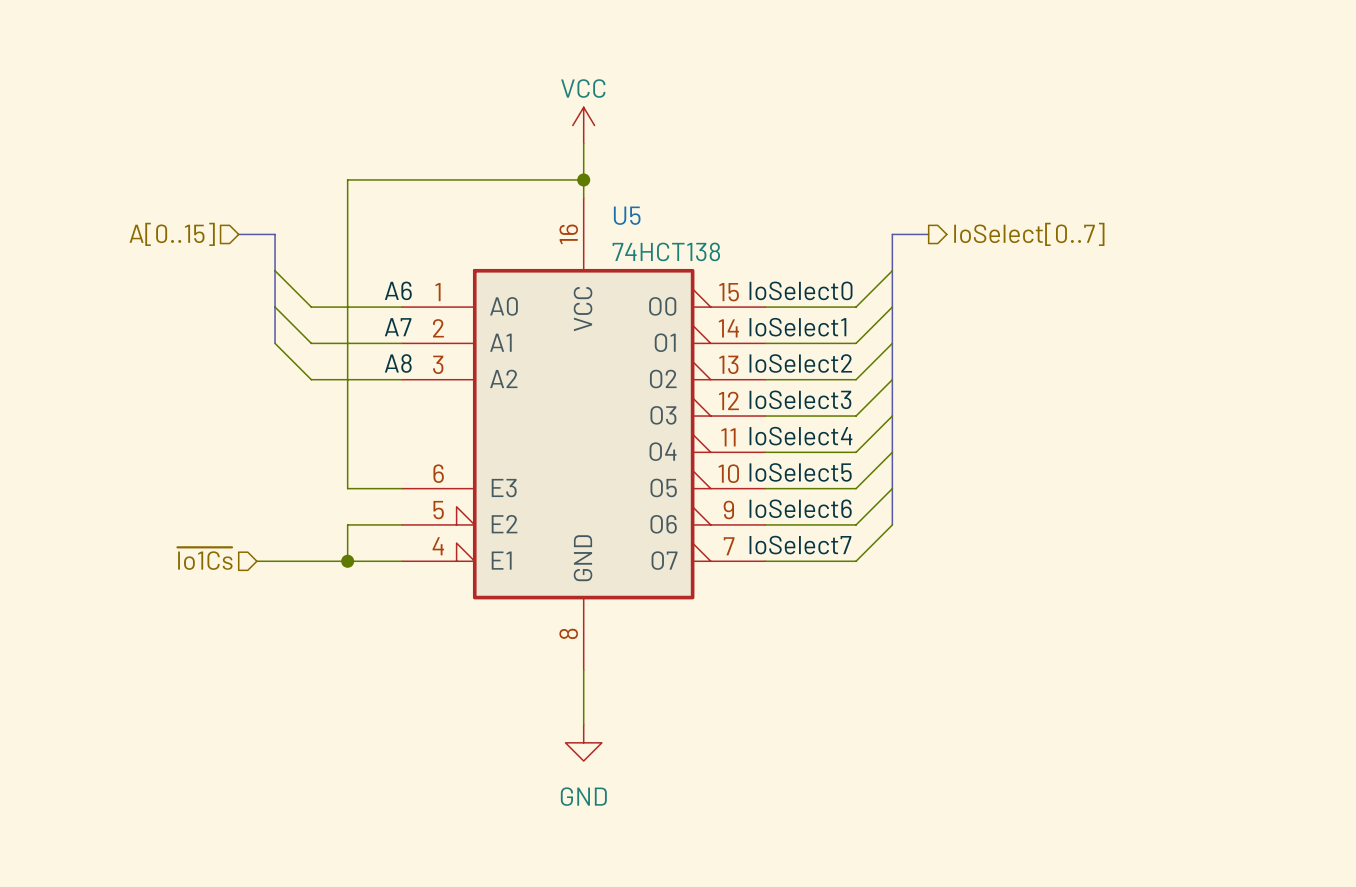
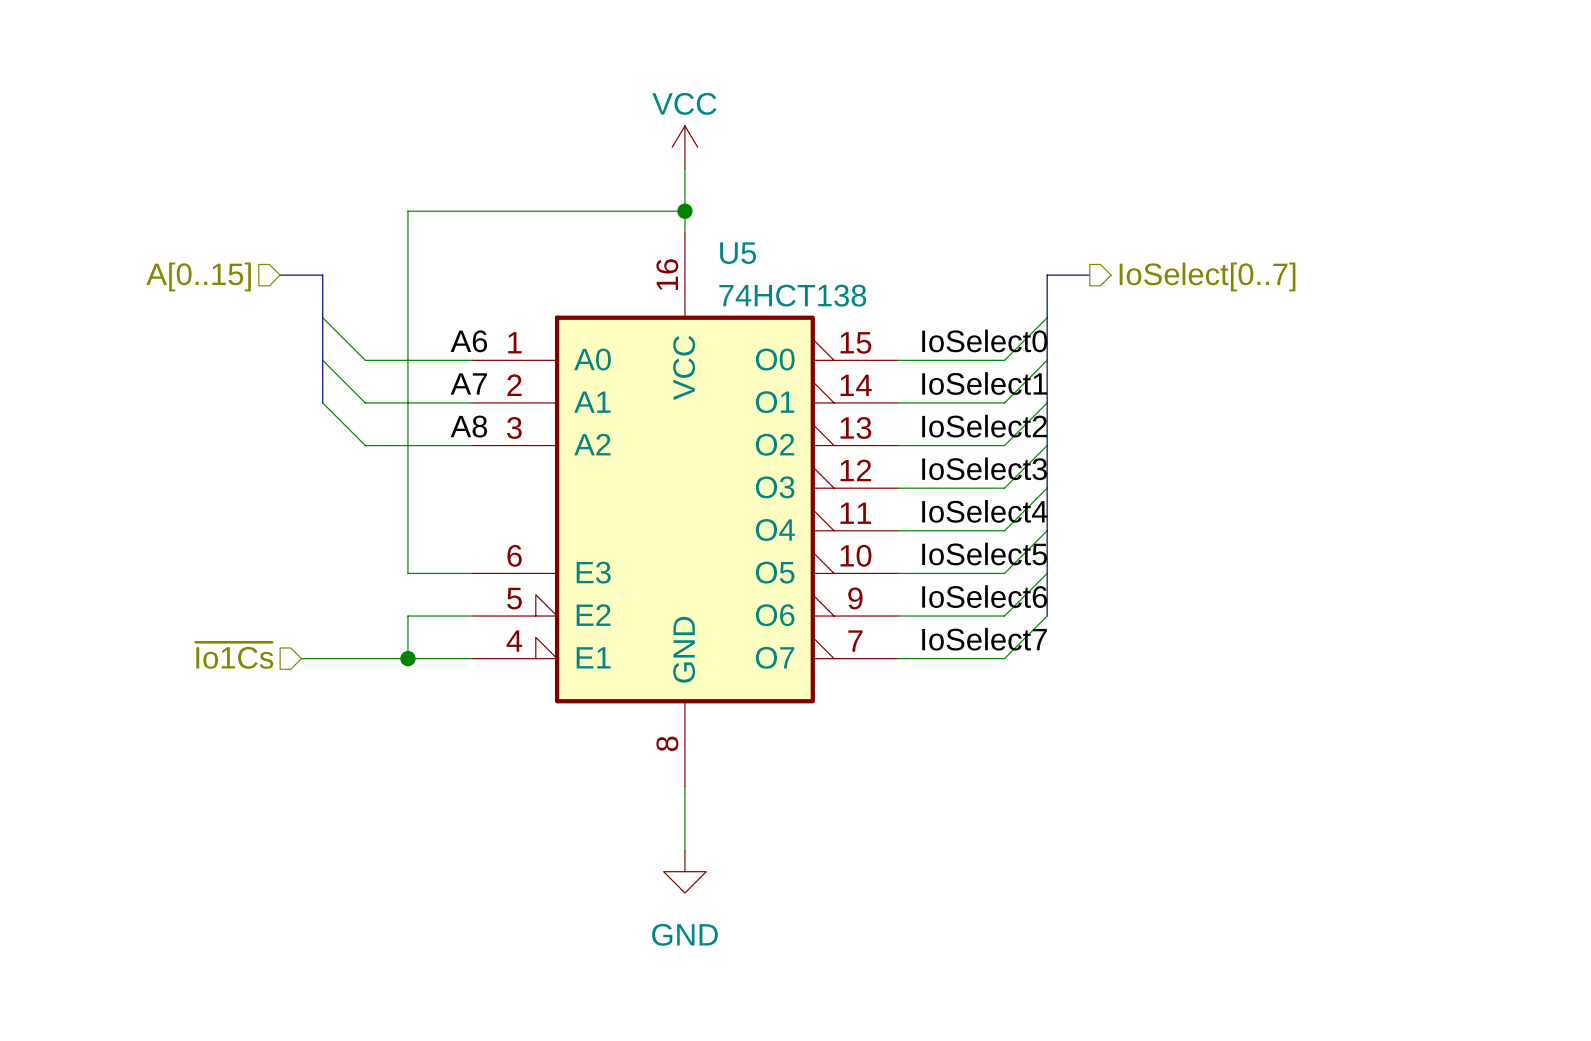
label position: IoSelect0 (801, 290) -> IoSelect0 (984, 340)
label position: IoSelect1 (797, 327) -> IoSelect1 (984, 383)
label position: IoSelect2 (800, 363) -> IoSelect2 (984, 426)
label position: IoSelect3 (800, 399) -> IoSelect3 (984, 468)
label position: IoSelect4 (800, 436) -> IoSelect4 (984, 511)
label position: IoSelect5 (800, 472) -> IoSelect5 (984, 553)
label position: IoSelect6 (800, 508) -> IoSelect6 (984, 596)
label position: IoSelect7 (800, 545) -> IoSelect7 (984, 639)

